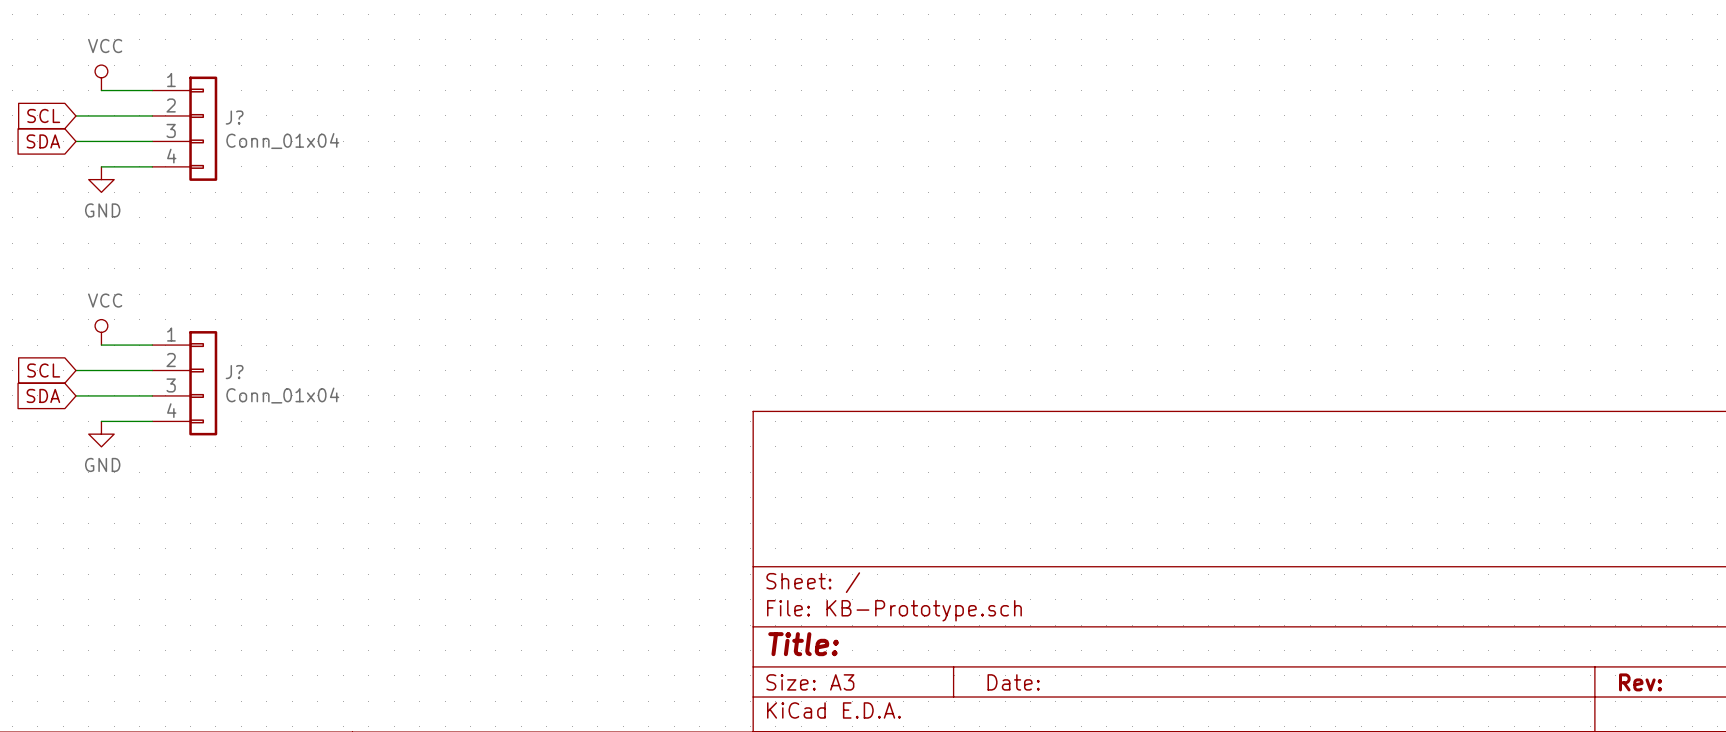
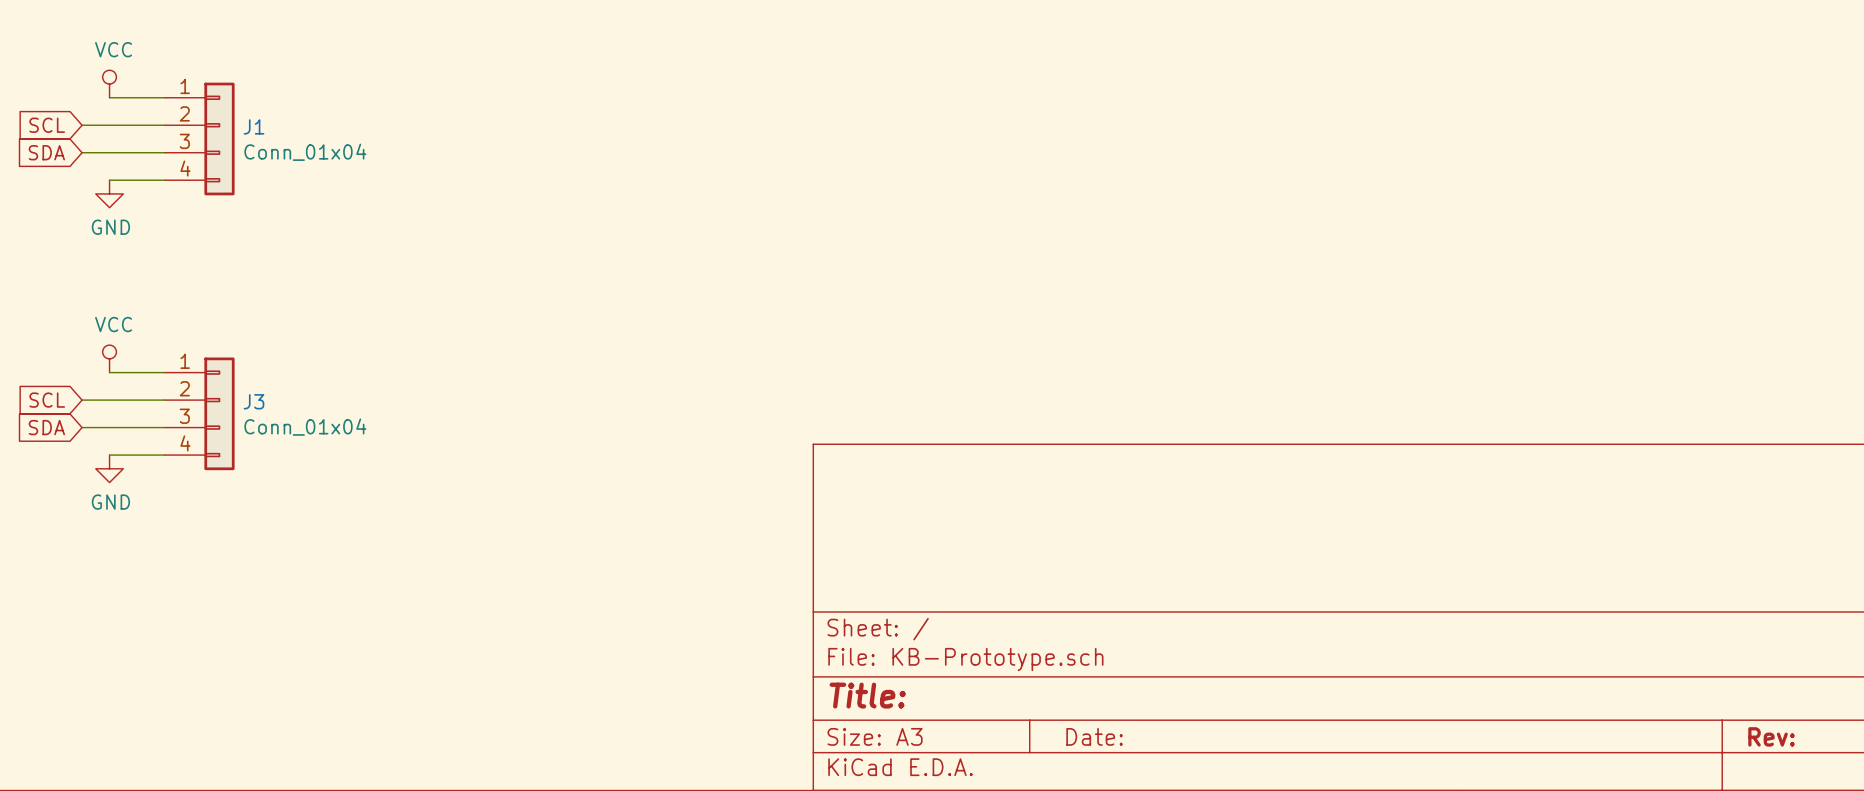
J? name: J? (234, 117) -> J1 (254, 126)
J? name: J? (234, 372) -> J3 (254, 401)

